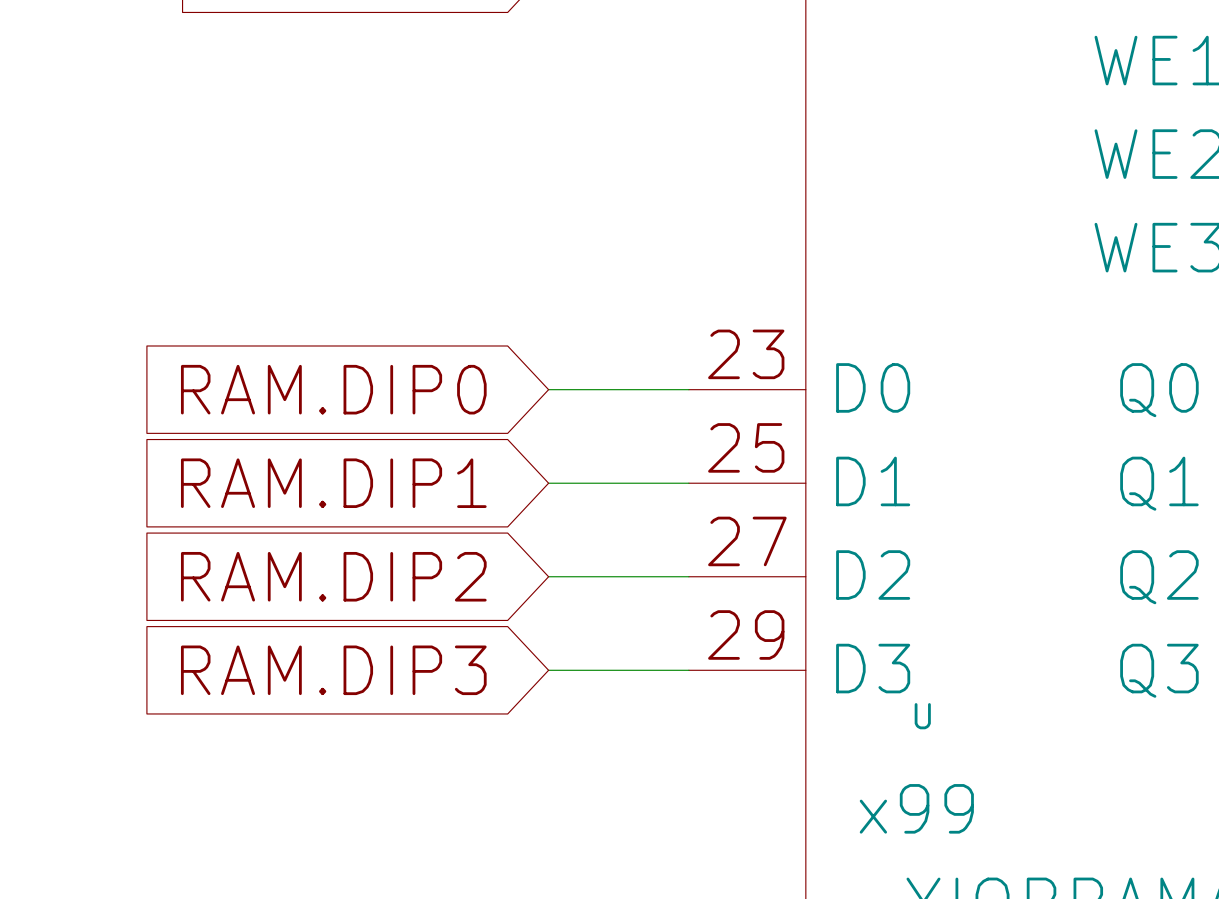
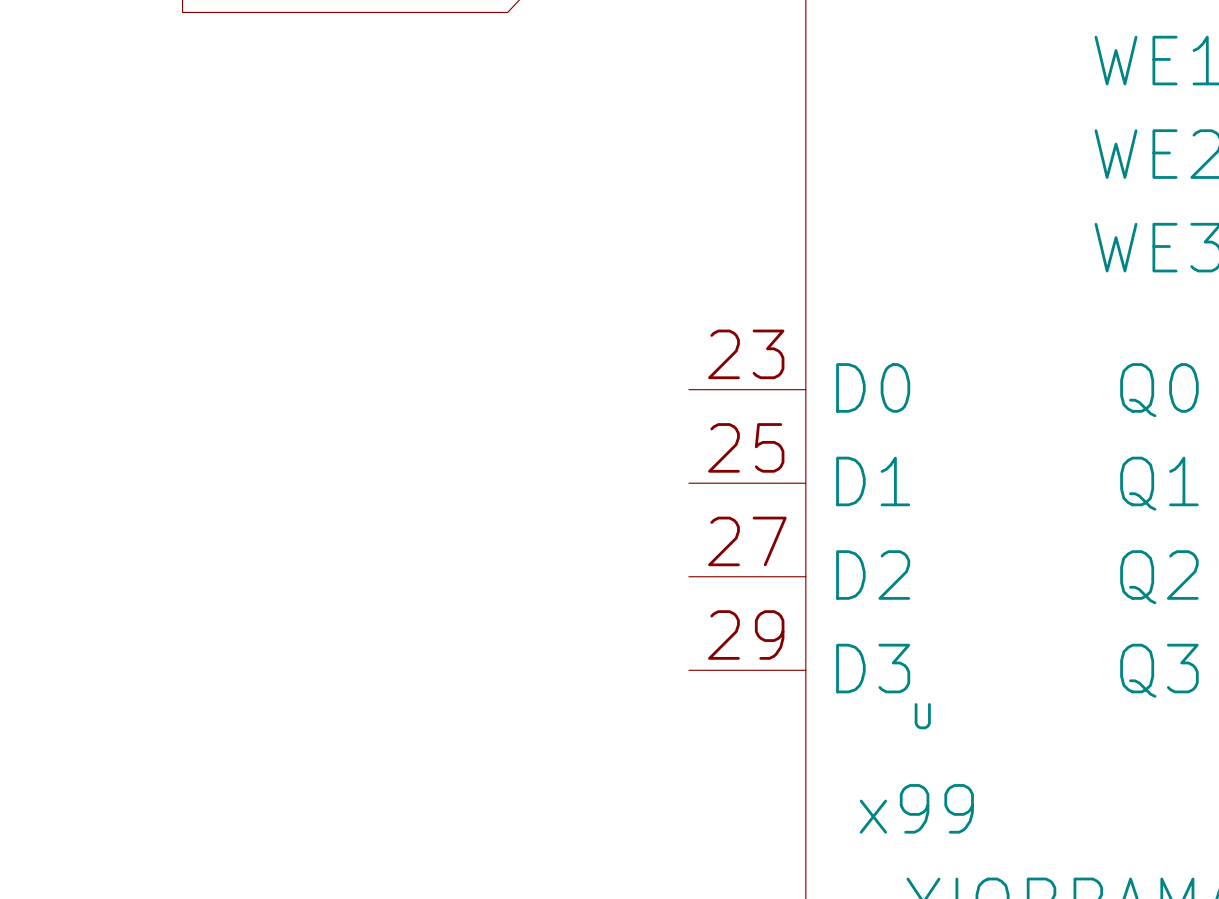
global label: RAM.DIP0 (333, 389) -> none
wire: (548, 389) (688, 389) -> none
global label: RAM.DIP1 (333, 483) -> none
wire: (548, 483) (688, 483) -> none
global label: RAM.DIP2 (333, 576) -> none
wire: (548, 576) (688, 576) -> none
global label: RAM.DIP3 (333, 670) -> none
wire: (548, 670) (688, 670) -> none

